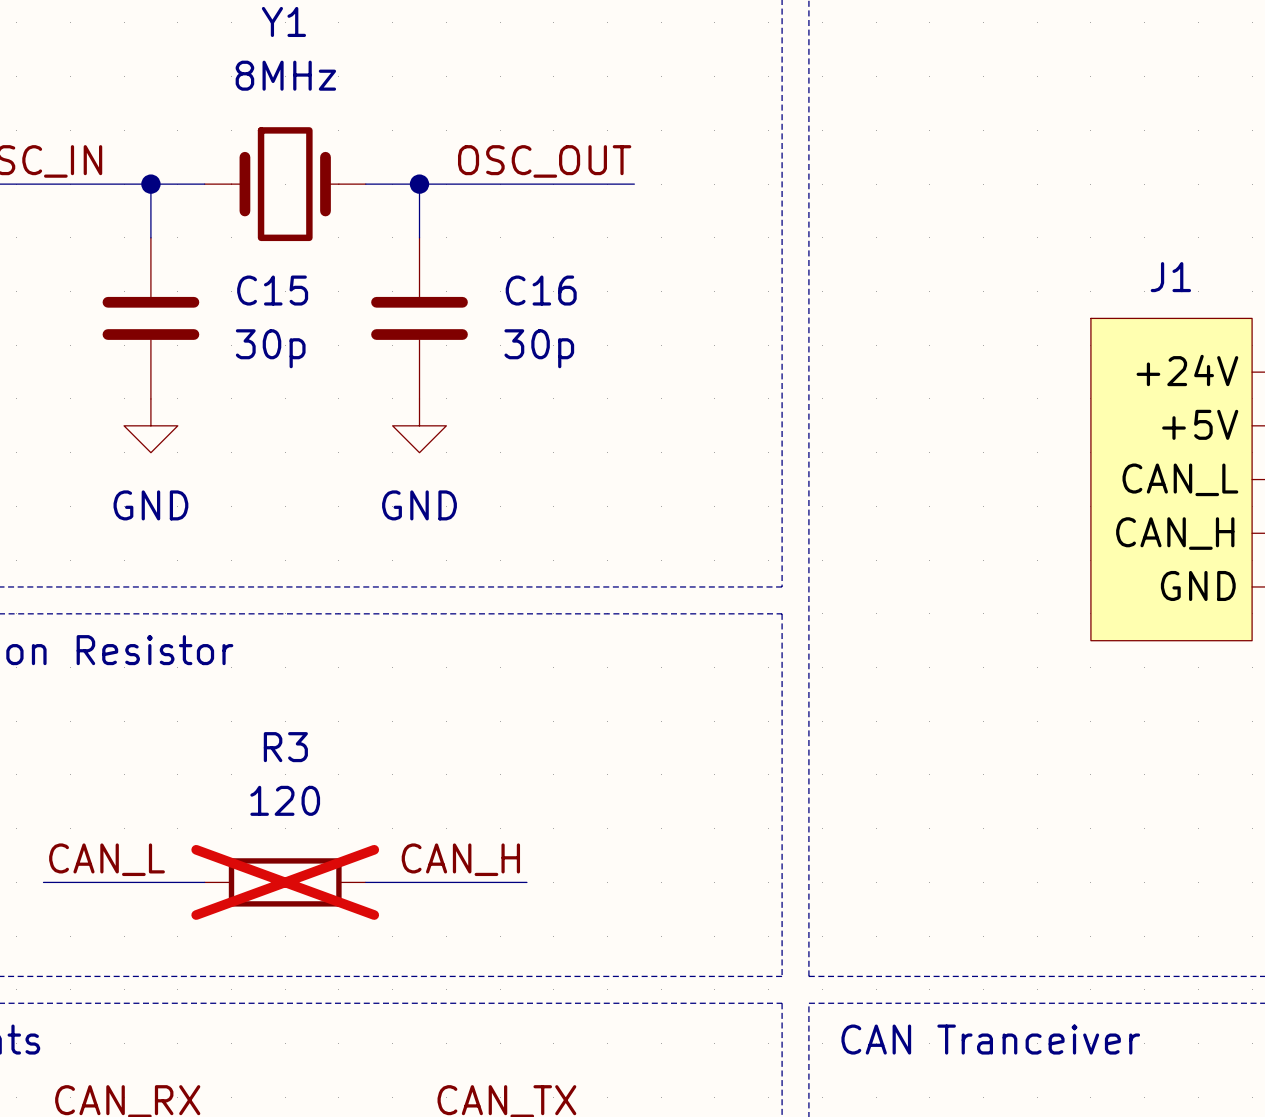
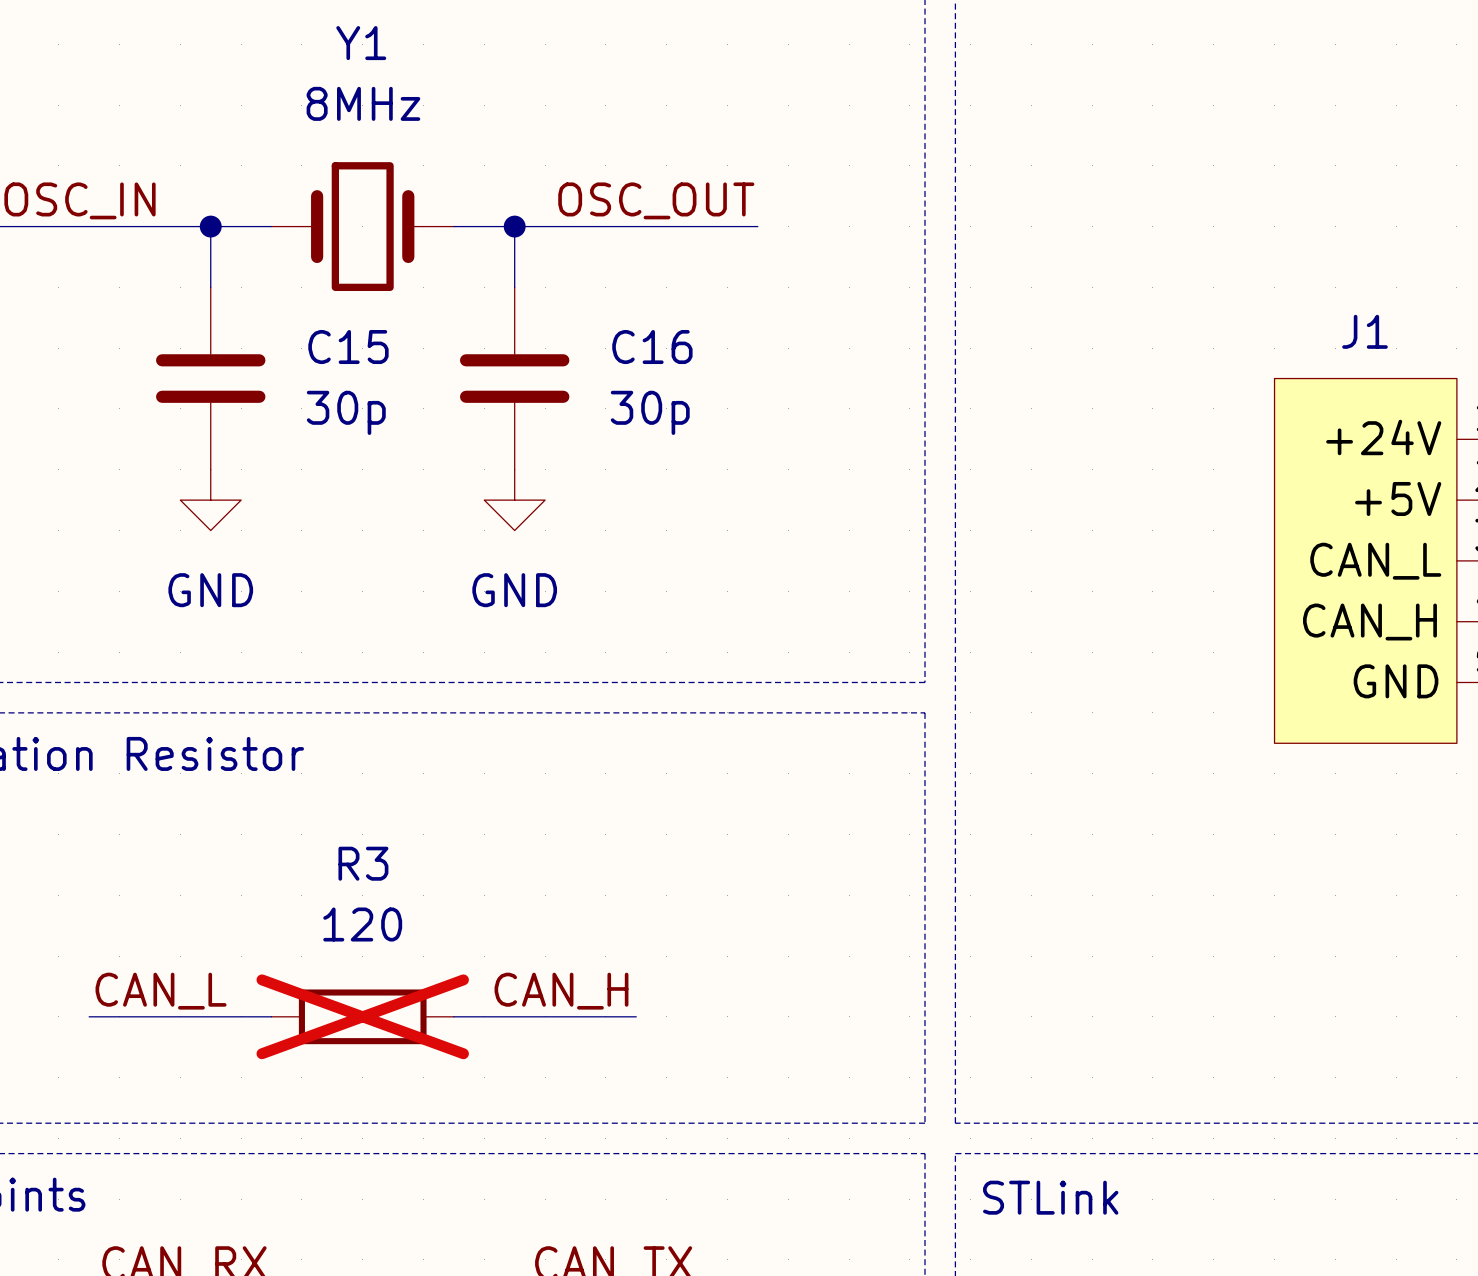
text: CAN Tranceiver (990, 1039) -> STLink (1050, 1197)

